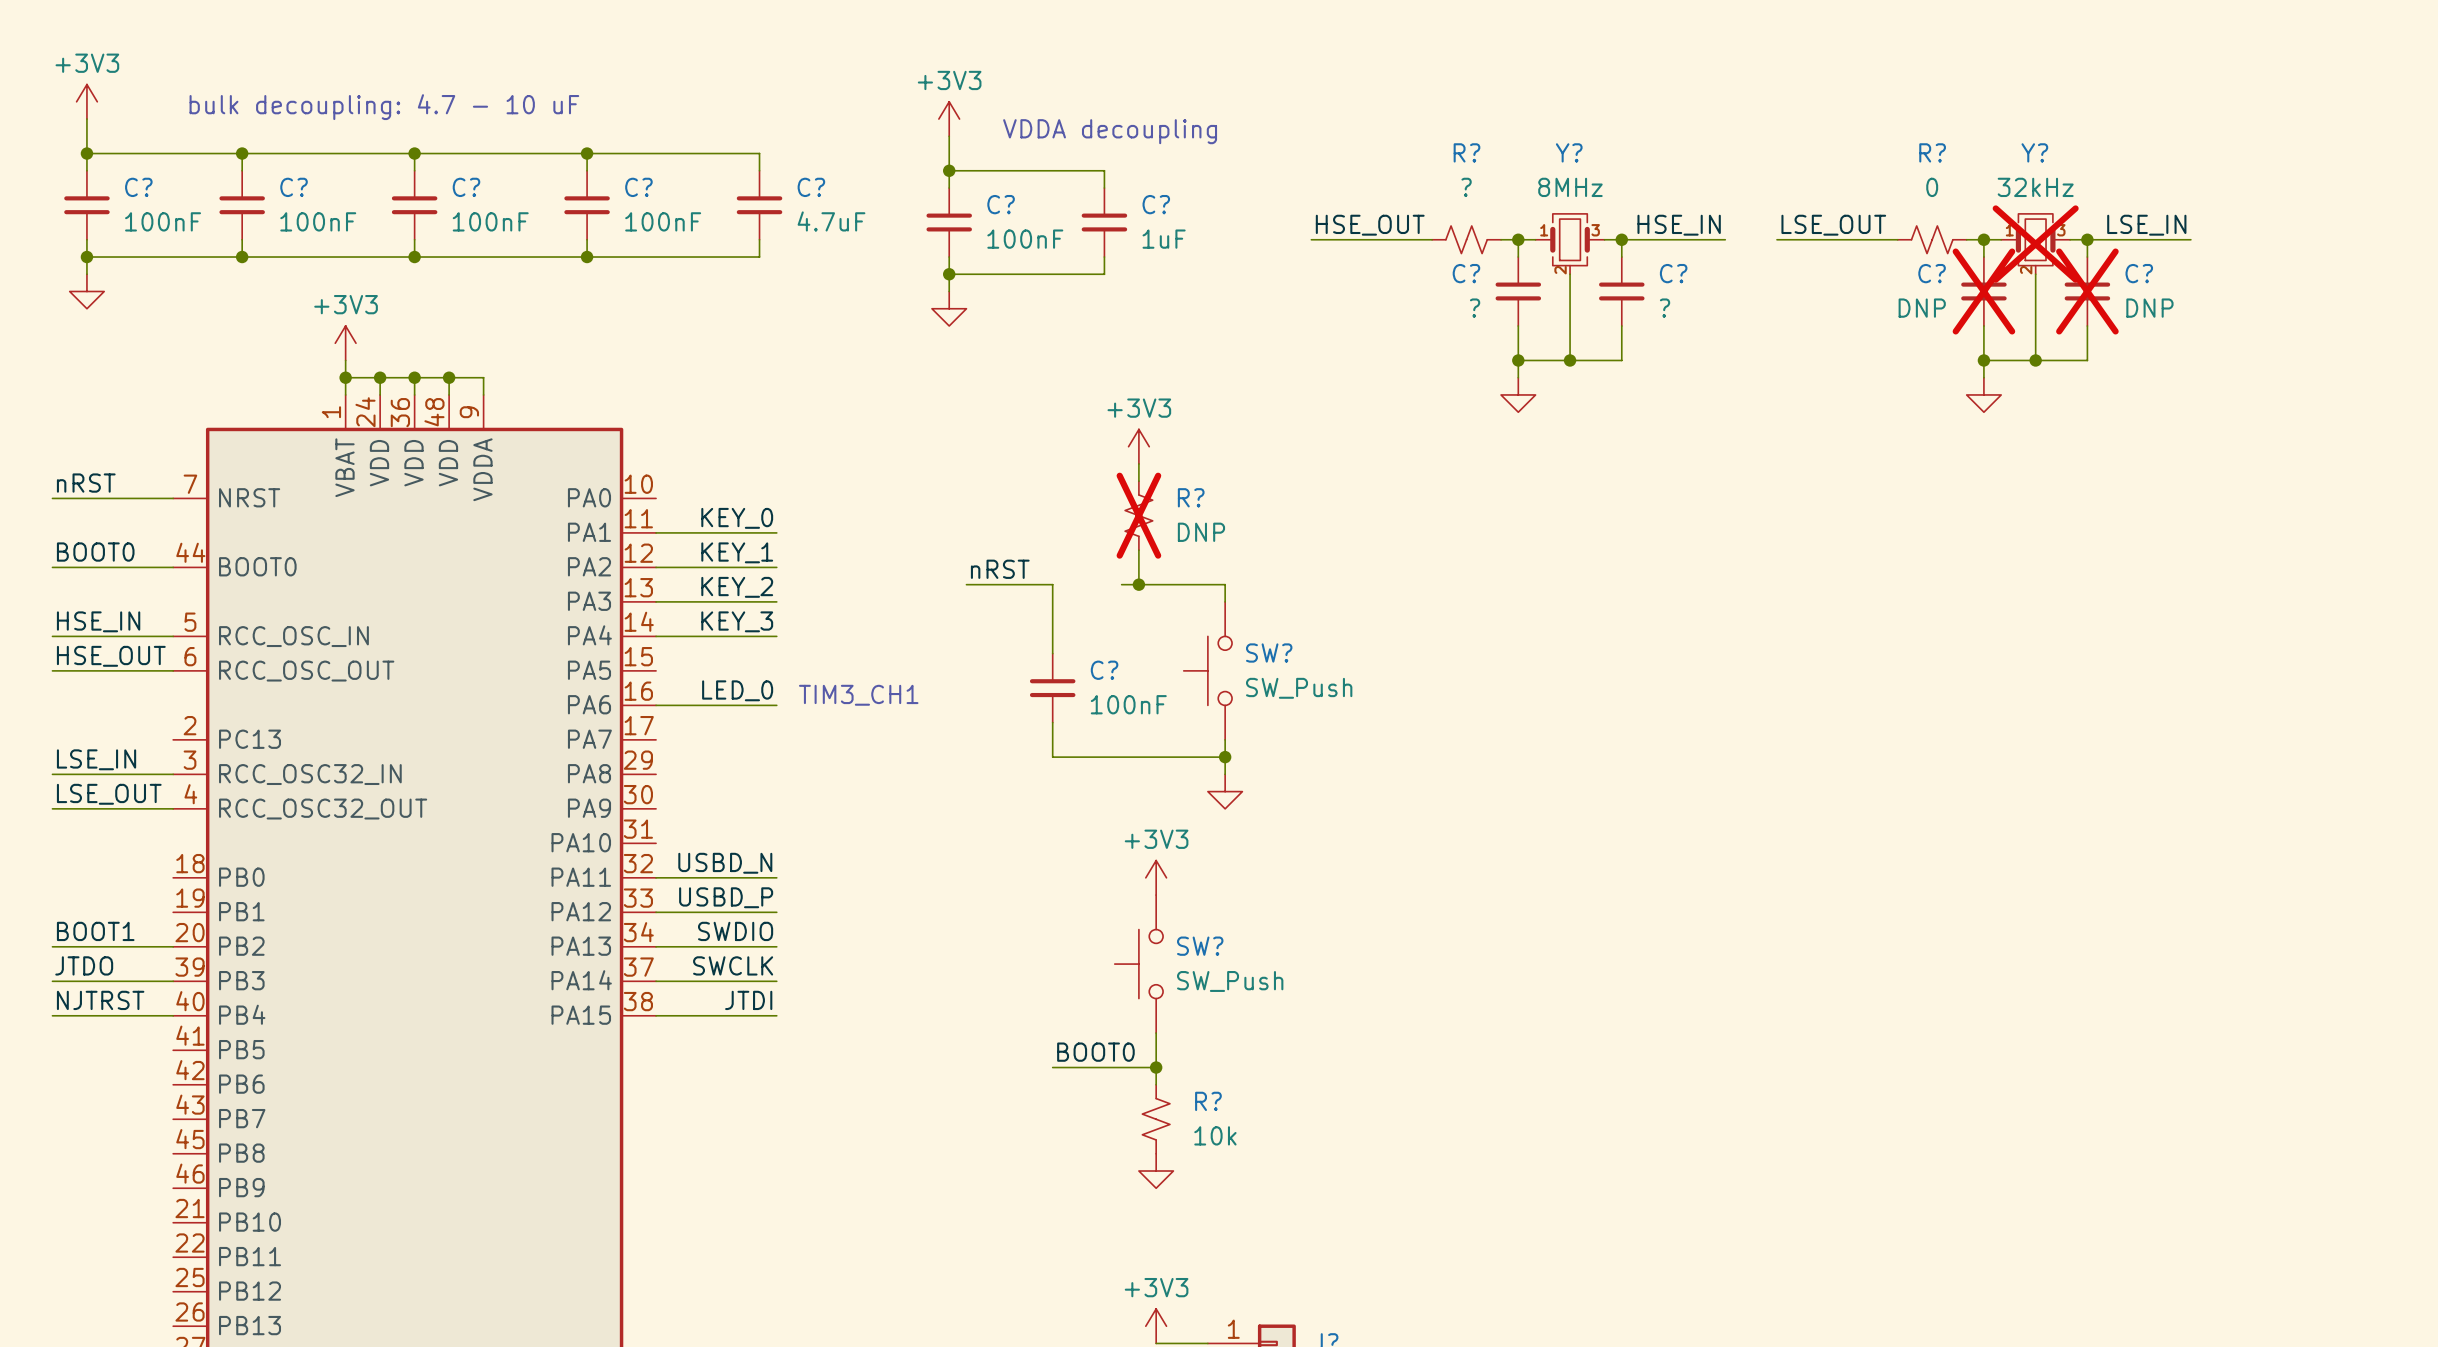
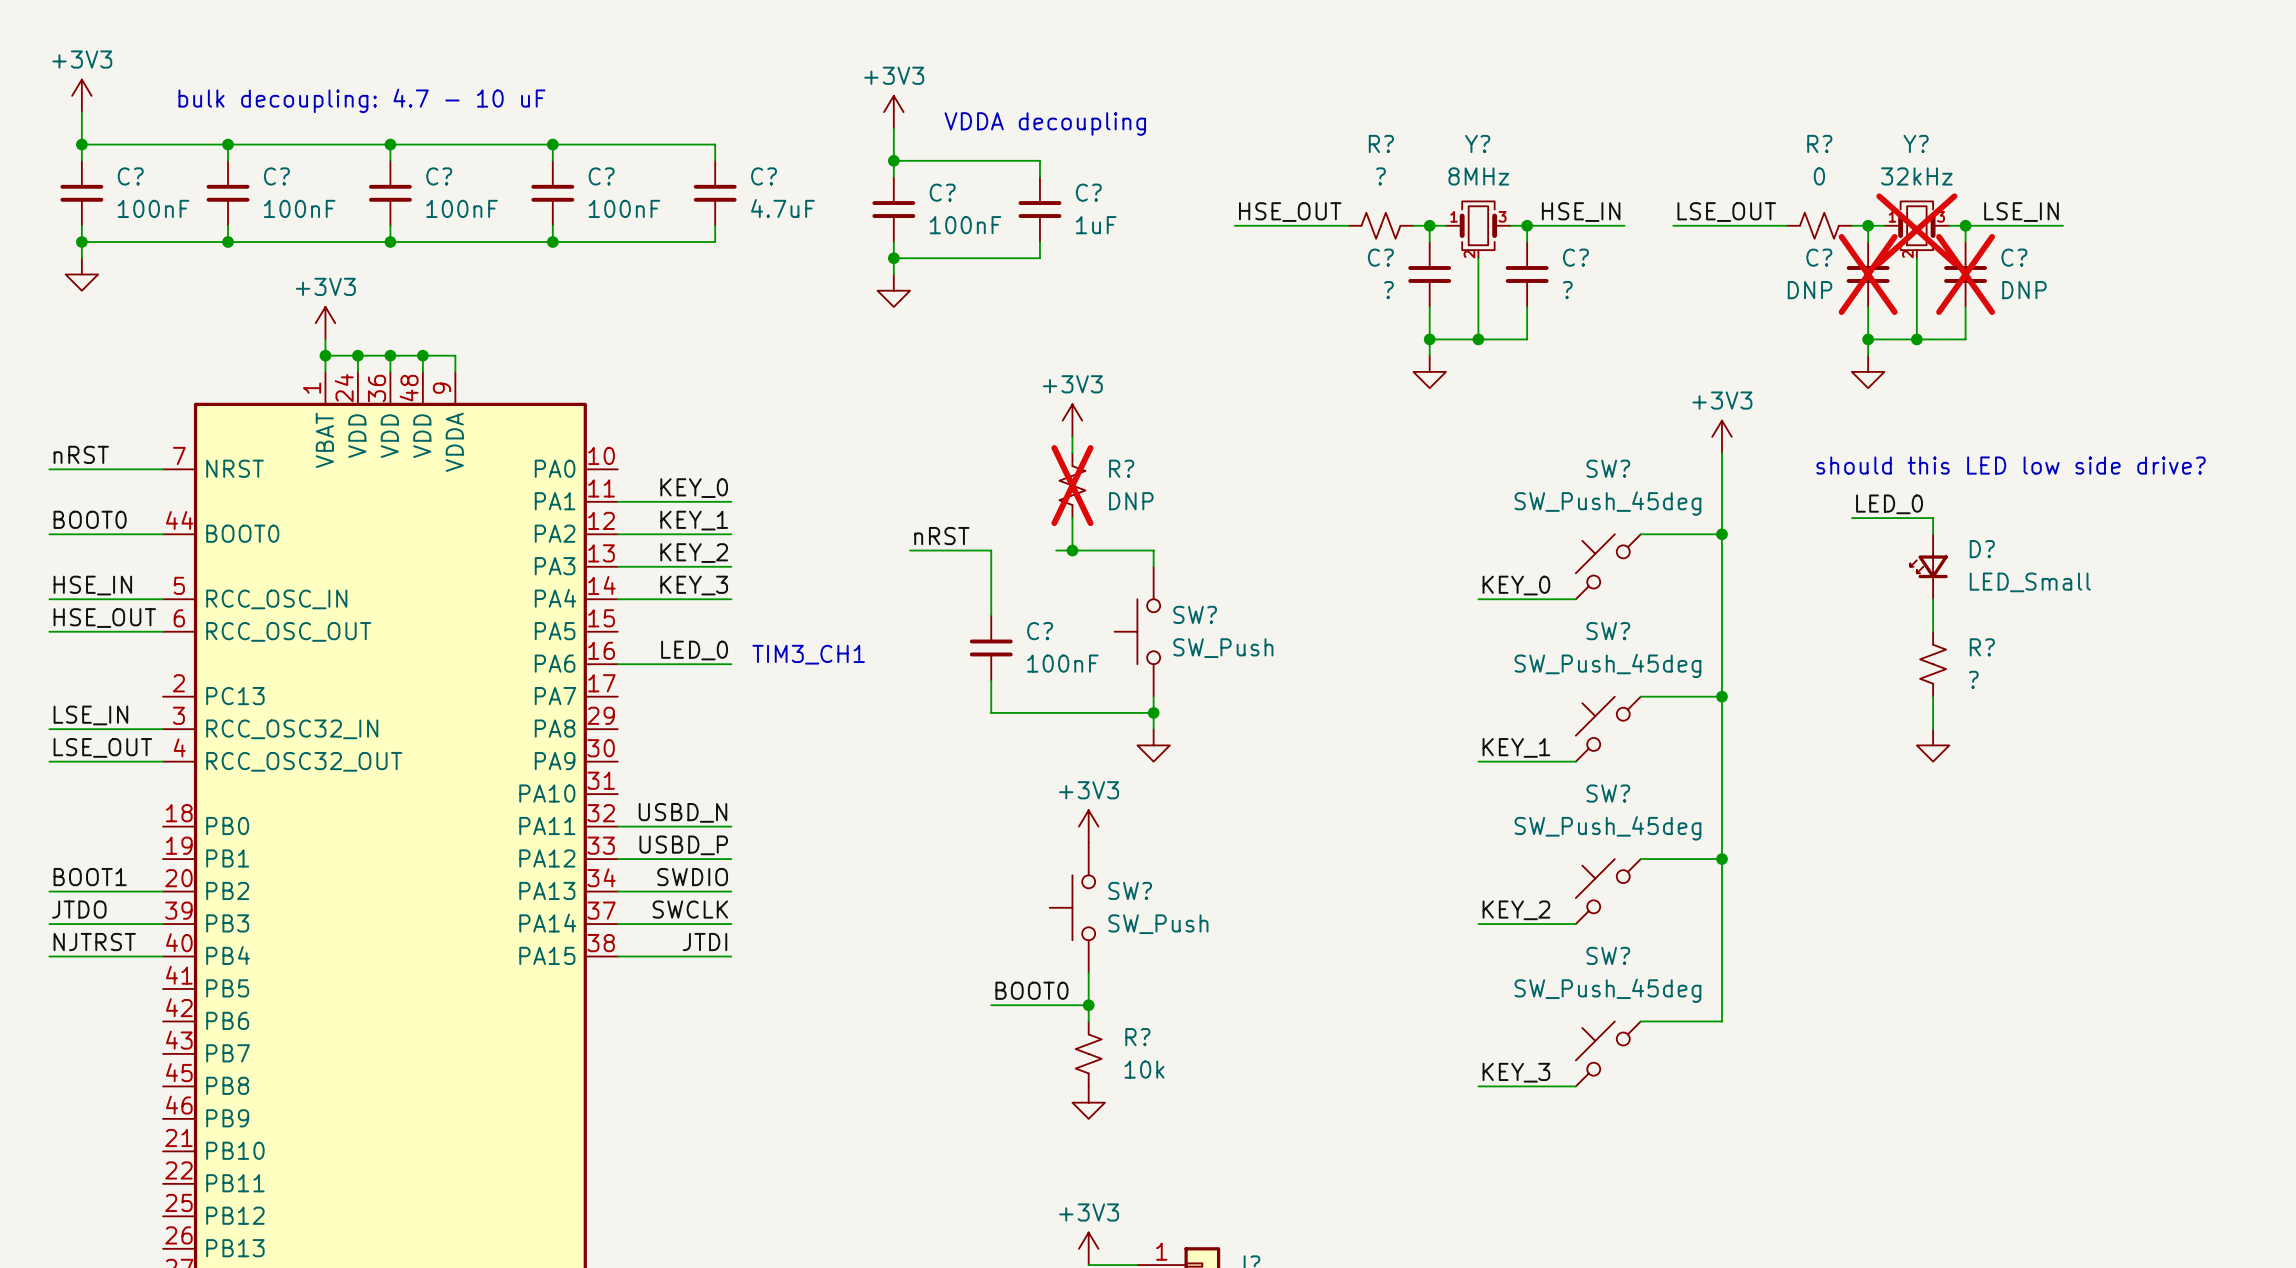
power symbol: none -> +3V3 (1721, 436)
wire: none -> (1721, 453) (1721, 1021) (1640, 1021)
text: none -> should this LED low side drive? (2011, 465)
label: none -> LED_0 (1889, 504)
wire: none -> (1851, 518) (1933, 518) (1933, 534)
wire: none -> (1640, 534) (1721, 534)
junction: none -> (1721, 534)
SW?: none -> SW_Push_45deg (1608, 566)
D?: none -> LED_Small (1929, 566)
label: none -> KEY_0 (1516, 585)
wire: none -> (1478, 599) (1575, 599)
wire: none -> (1933, 599) (1933, 631)
R?: none -> ? (1933, 664)
wire: none -> (1640, 696) (1721, 696)
junction: none -> (1721, 696)
wire: none -> (1933, 696) (1933, 729)
SW?: none -> SW_Push_45deg (1608, 729)
power symbol: none -> (1933, 745)
label: none -> KEY_1 (1516, 747)
wire: none -> (1478, 761) (1575, 761)
wire: none -> (1640, 859) (1721, 859)
junction: none -> (1721, 859)
SW?: none -> SW_Push_45deg (1608, 891)
label: none -> KEY_2 (1516, 910)
wire: none -> (1478, 924) (1575, 924)
SW?: none -> SW_Push_45deg (1608, 1053)
label: none -> KEY_3 (1516, 1072)
wire: none -> (1478, 1086) (1575, 1086)

